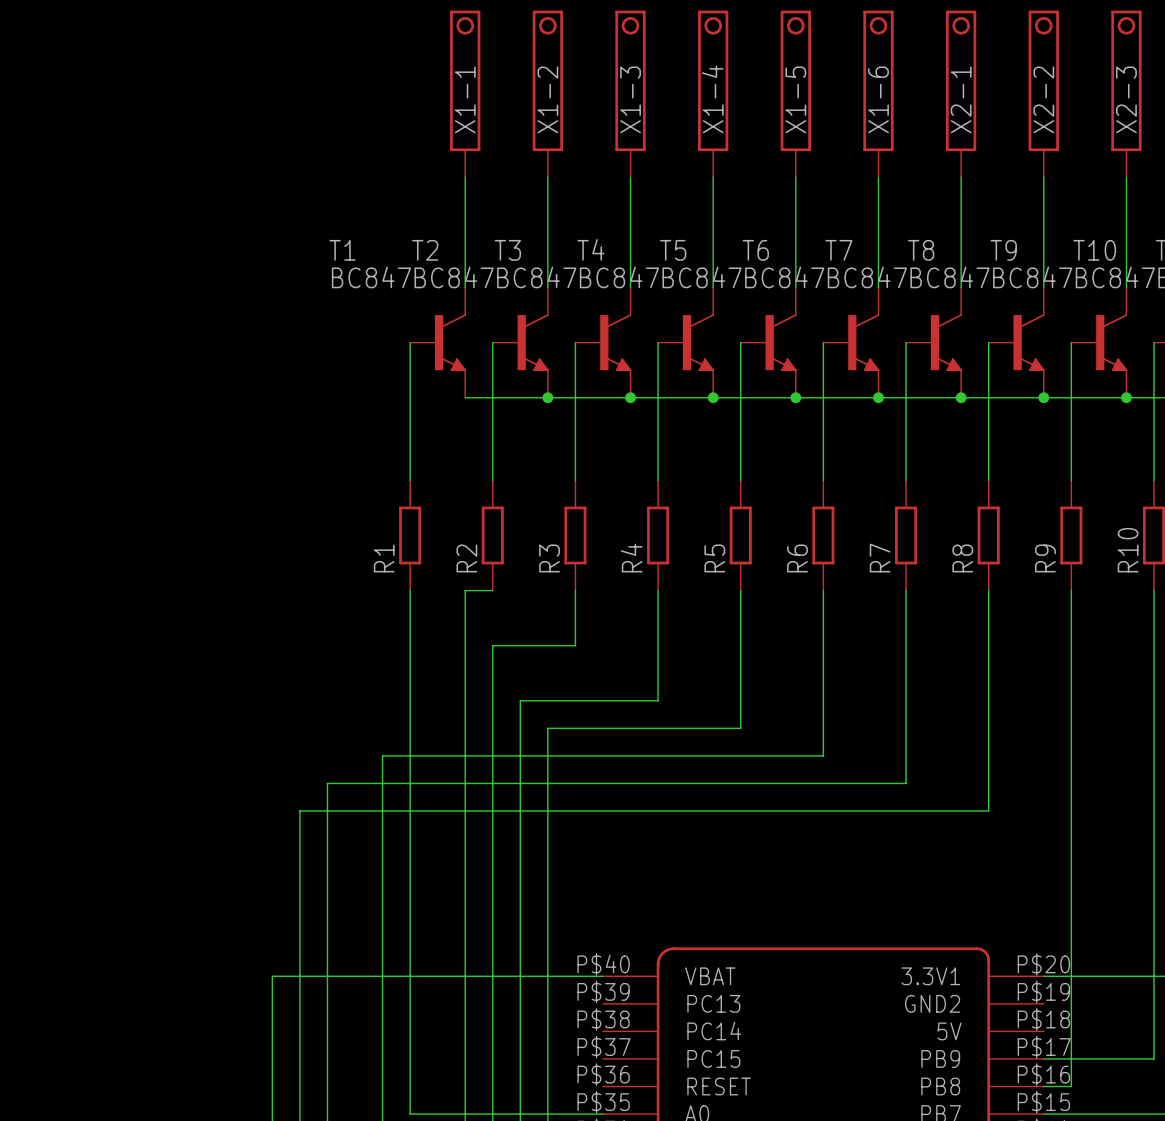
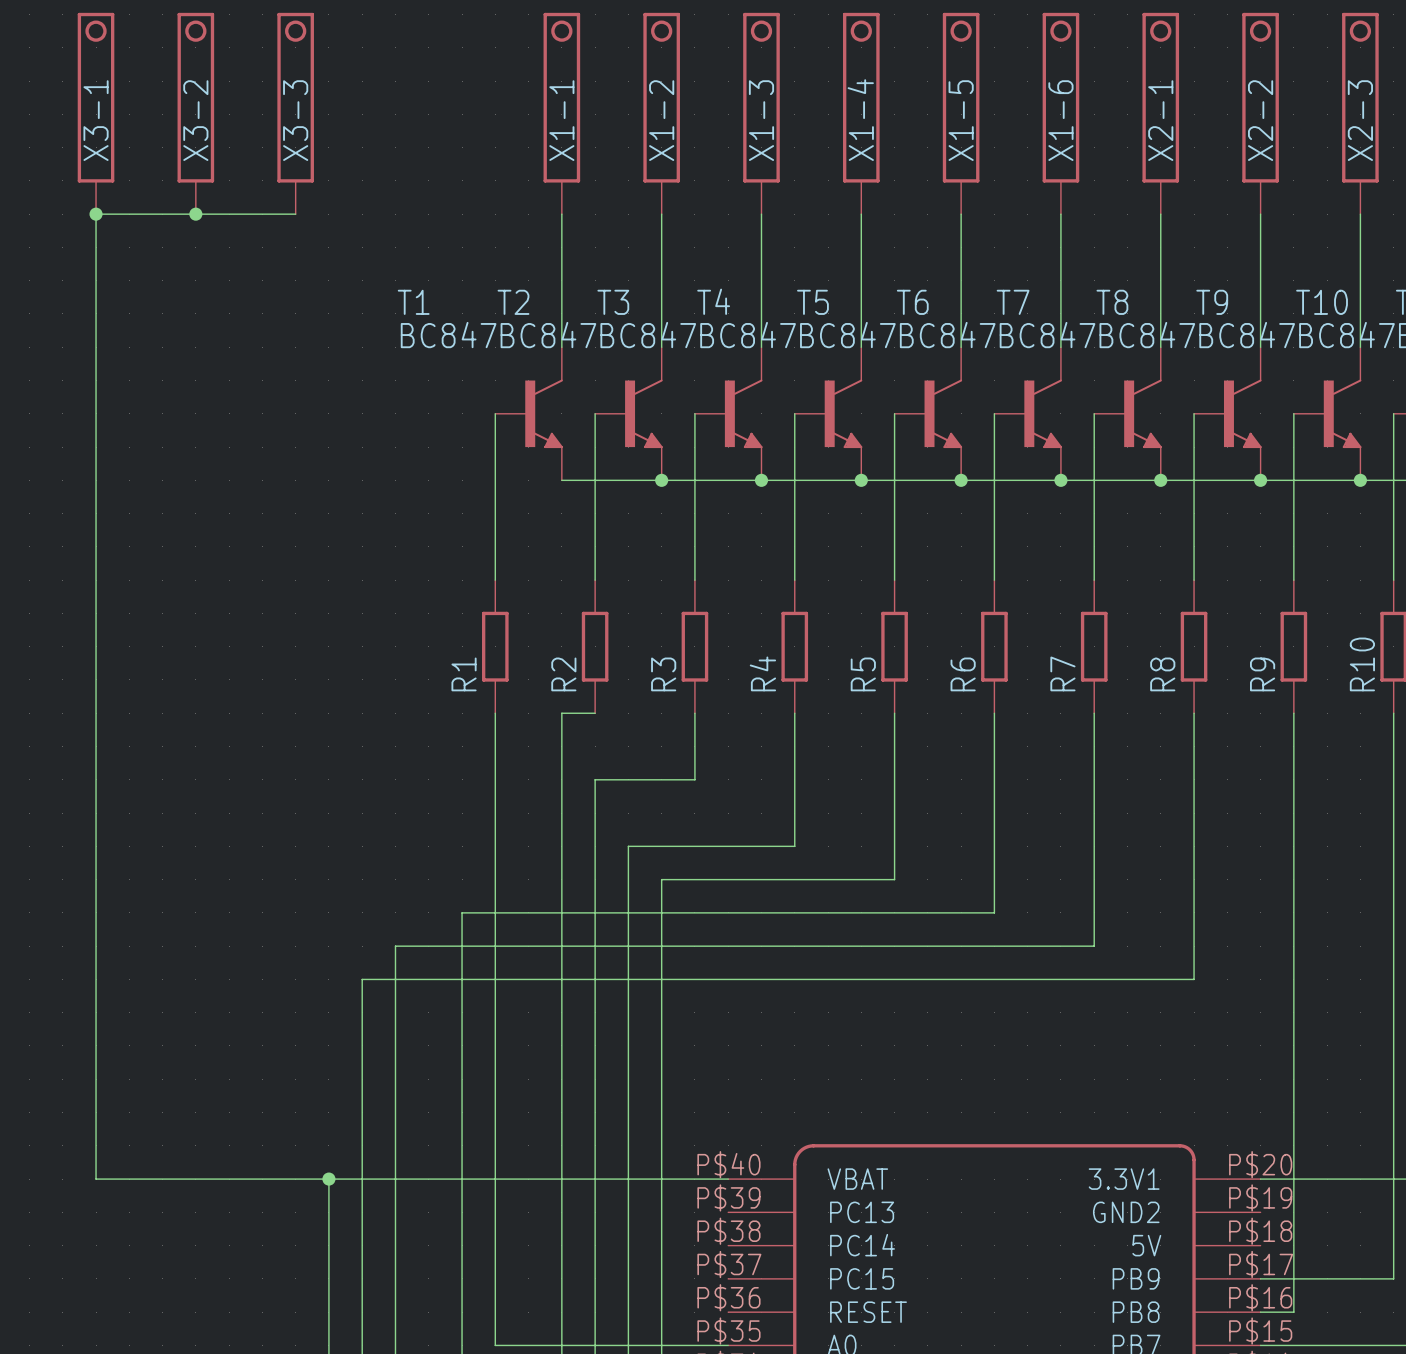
X3-1: none -> (96, 113)
X3-2: none -> (195, 113)
X3-3: none -> (295, 113)
junction: none -> (96, 214)
junction: none -> (195, 214)
wire: none -> (295, 214) (96, 214) (96, 1179) (328, 1179)
junction: none -> (328, 1179)

